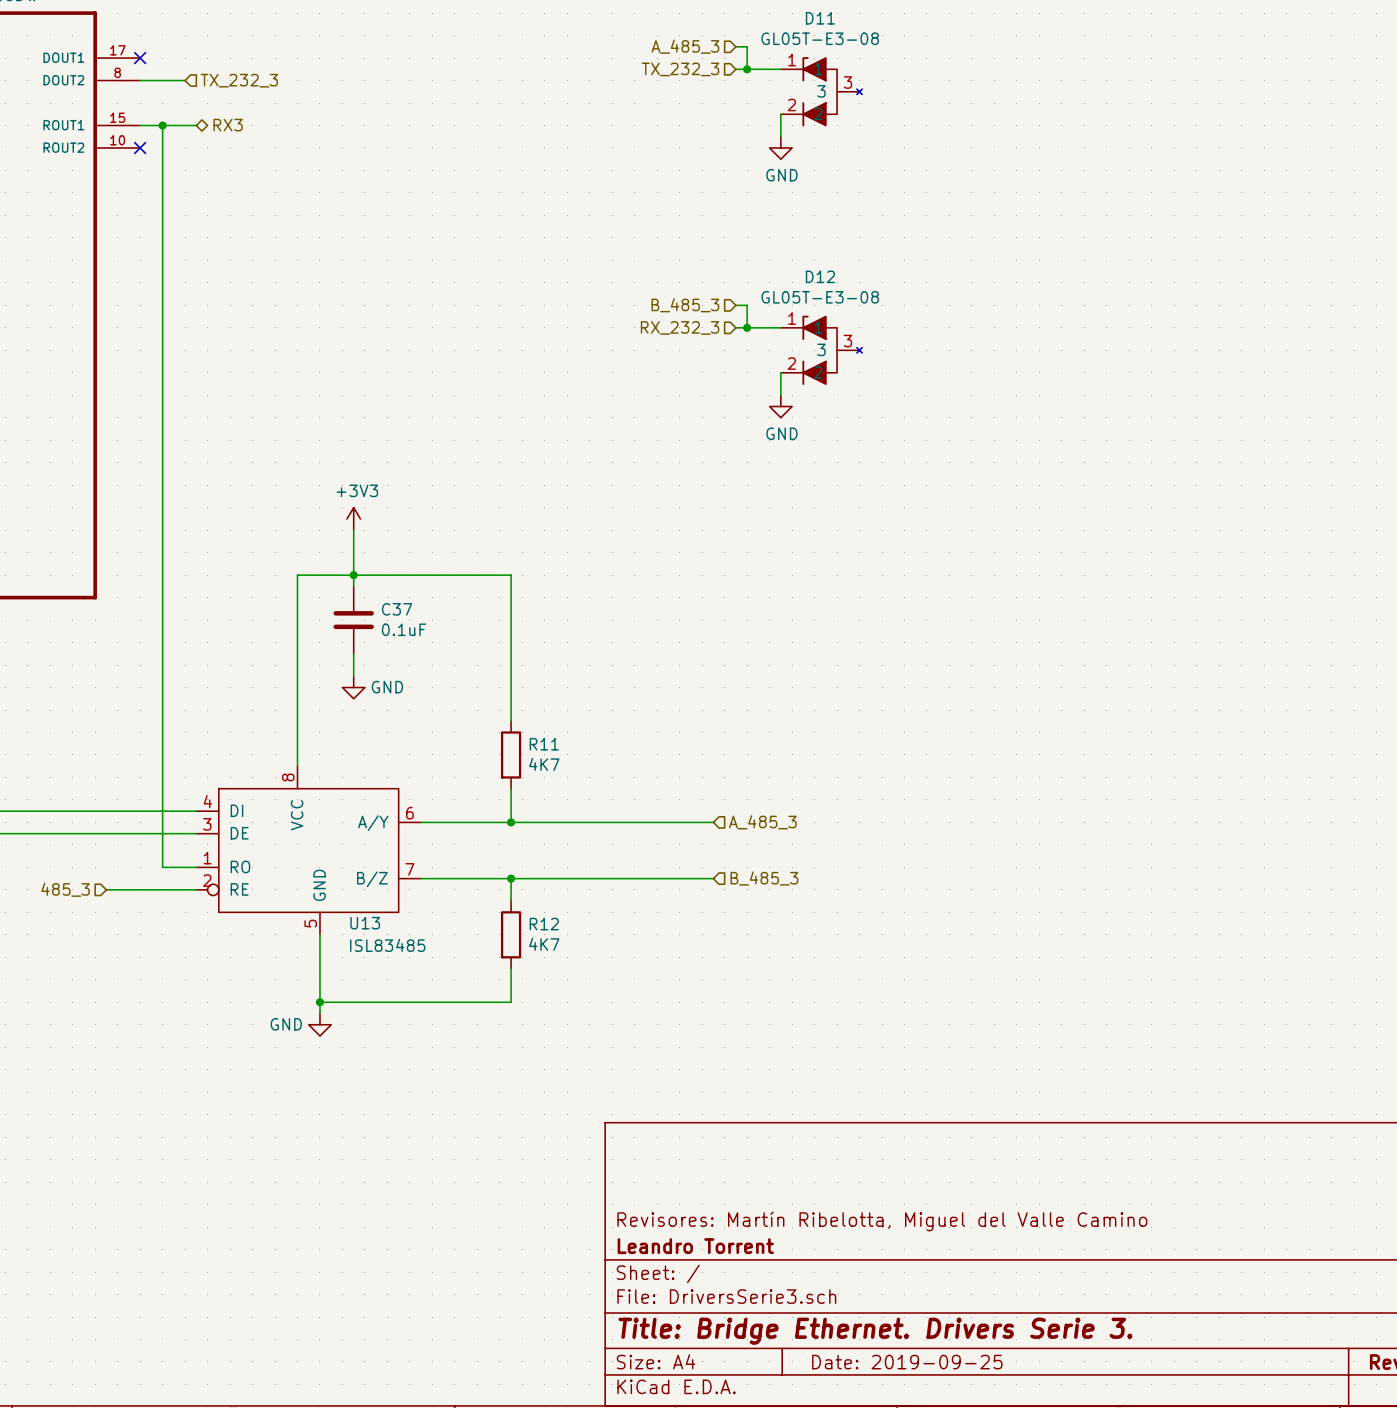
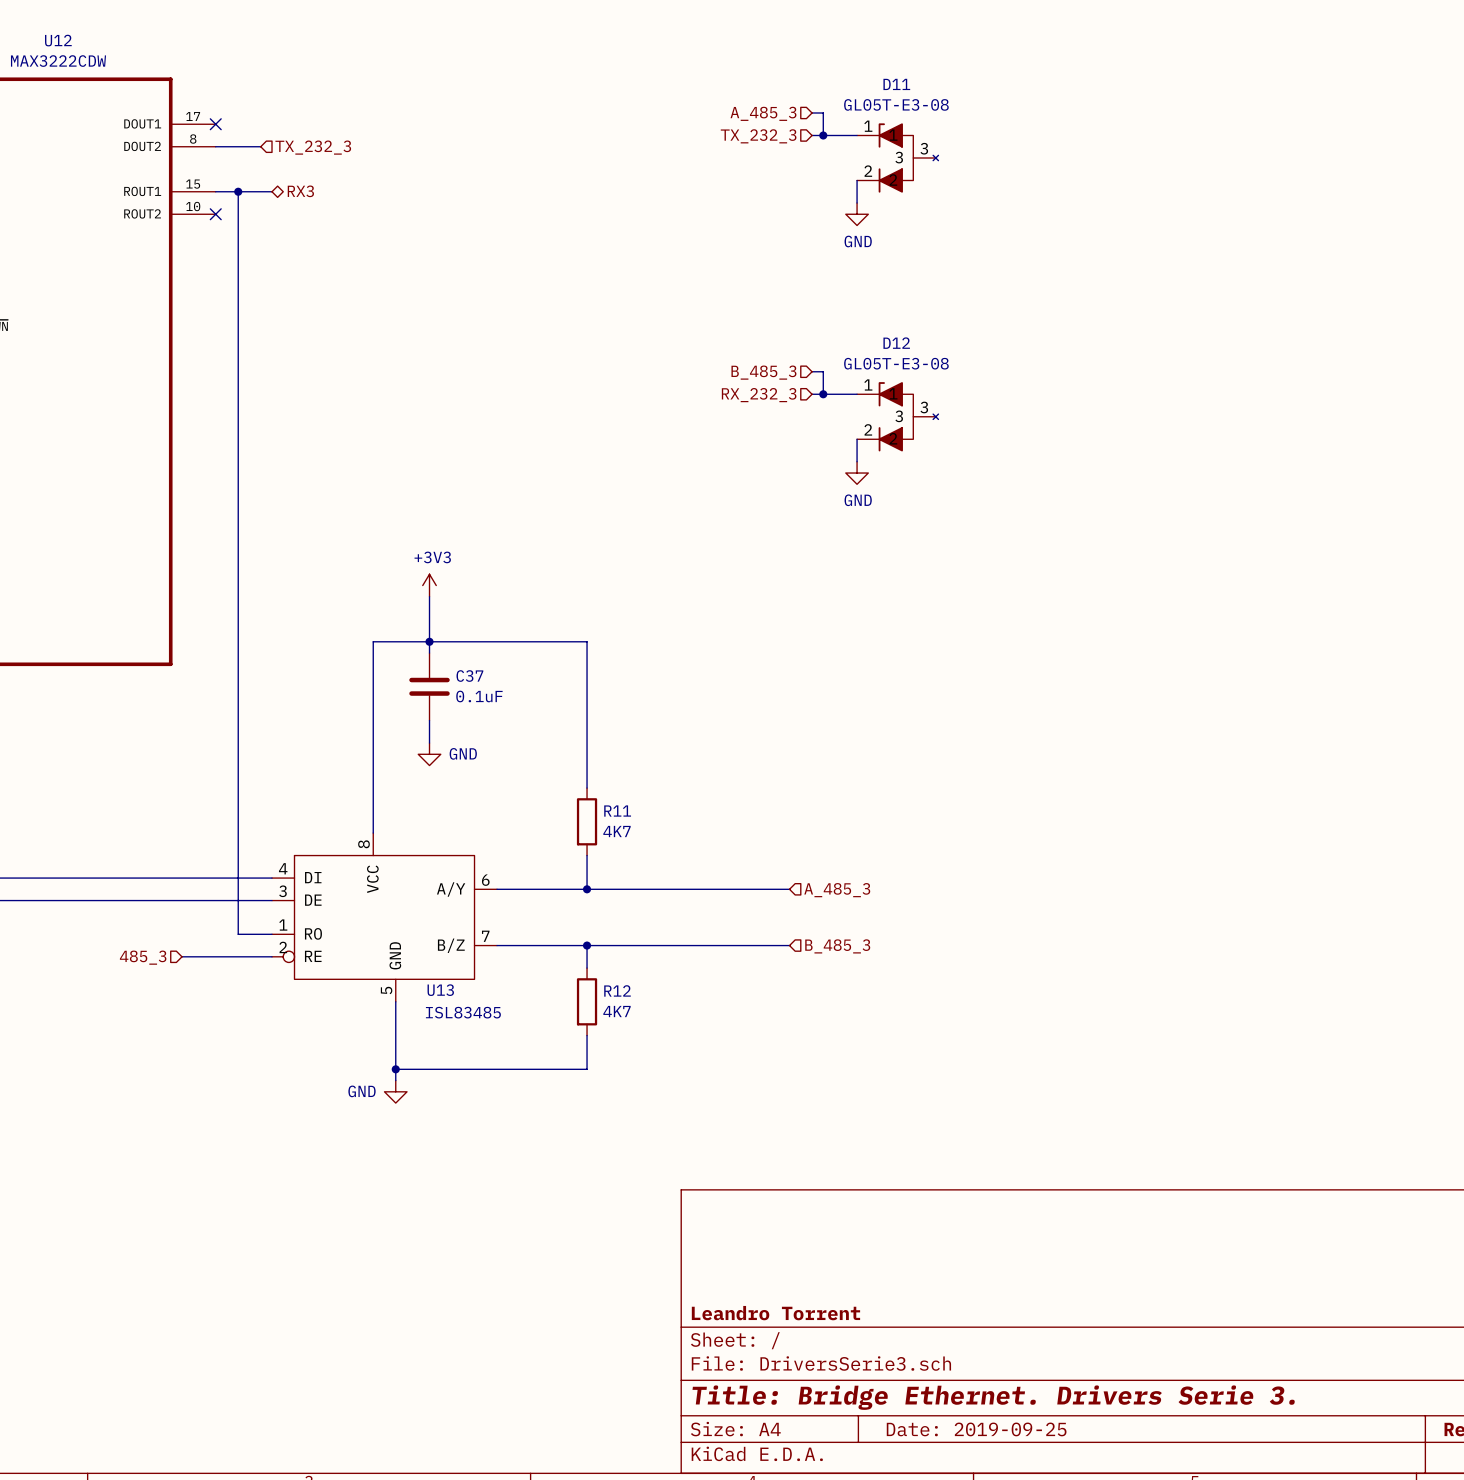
title block: Revisores: Martín Ribelotta, Miguel del Valle Camino (882, 1221) -> none

